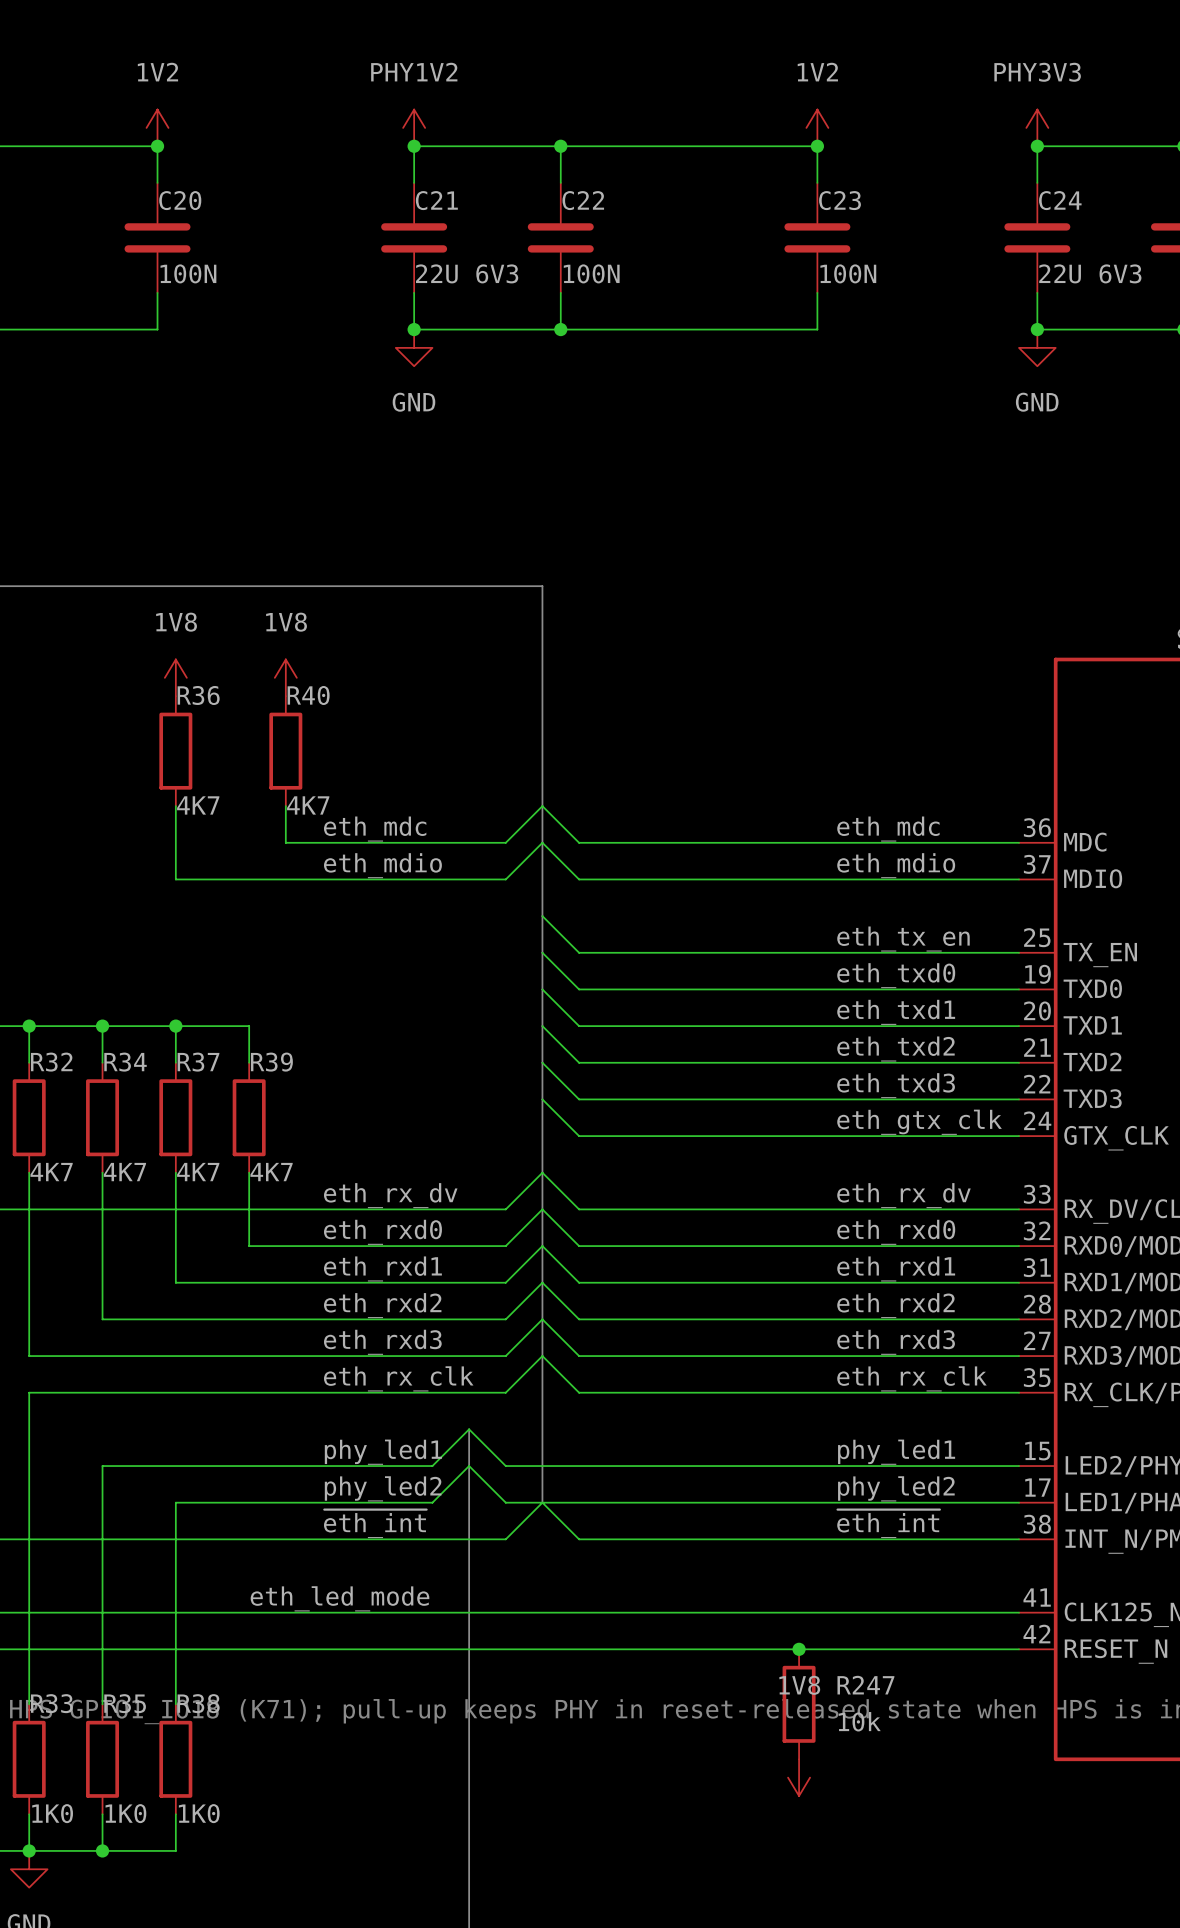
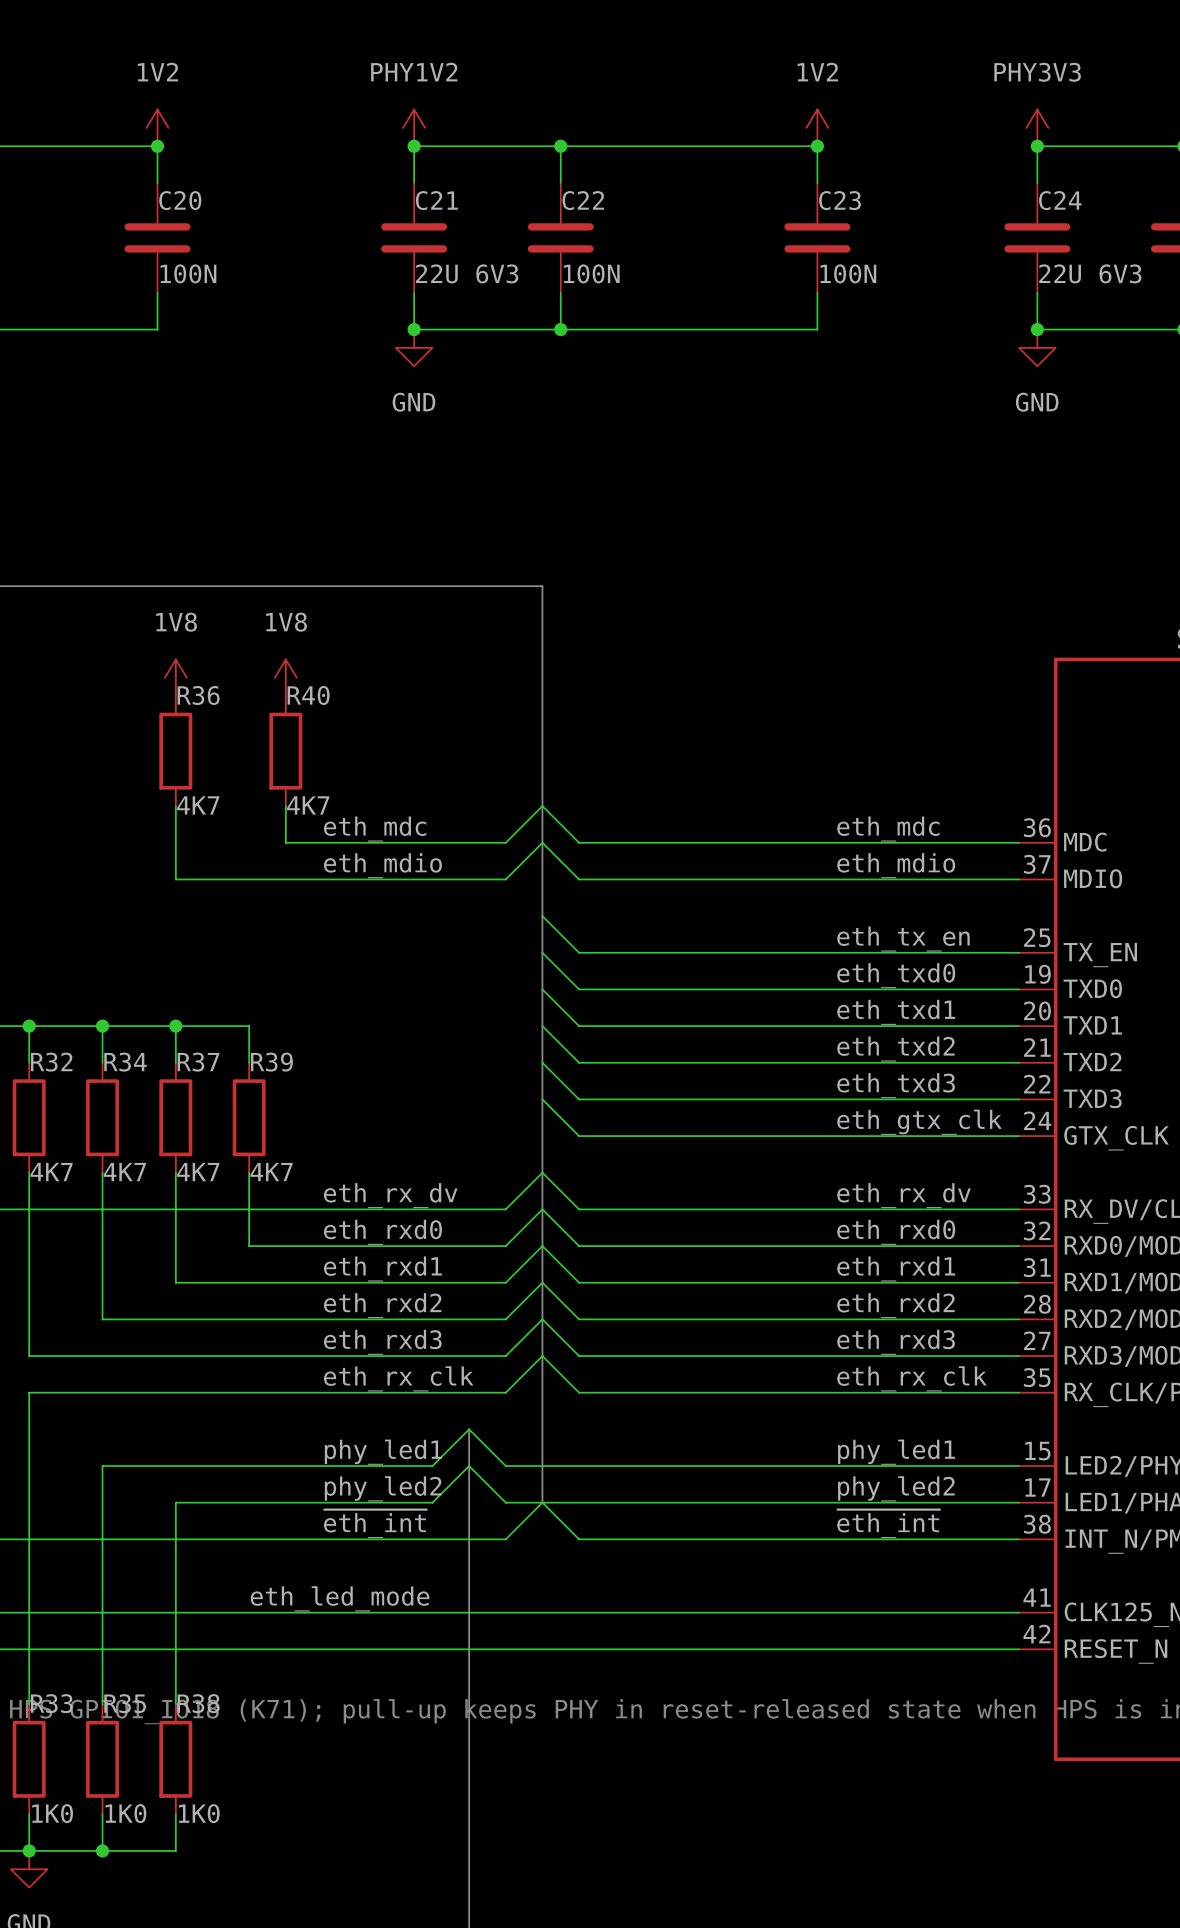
junction: (799, 1649) -> none
R247: 10k (799, 1704) -> none
power symbol: 1V8 (799, 1777) -> none

